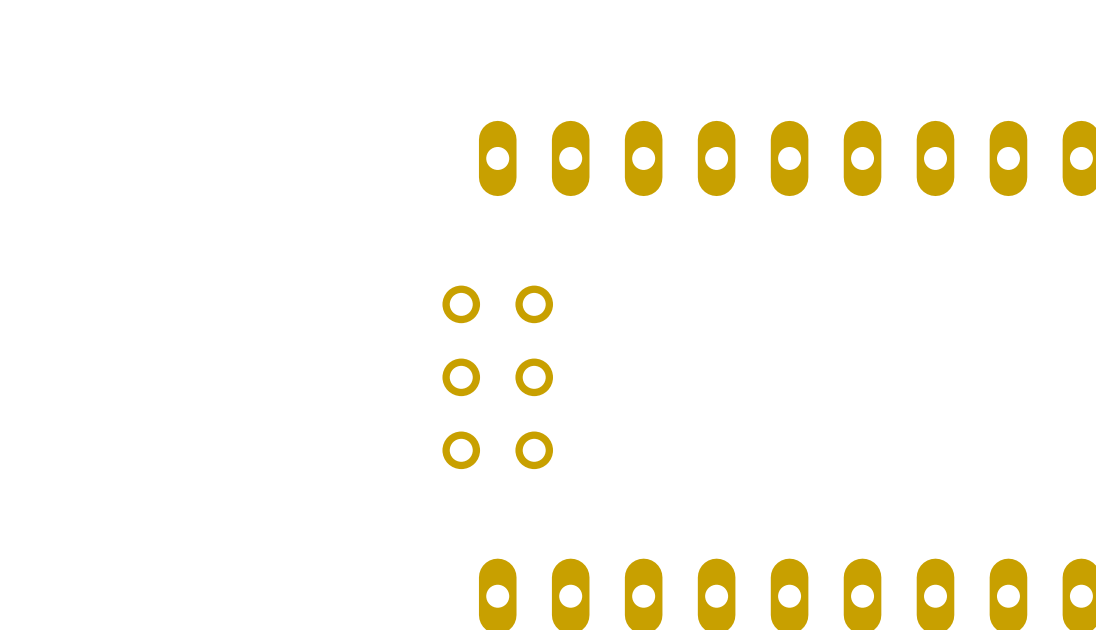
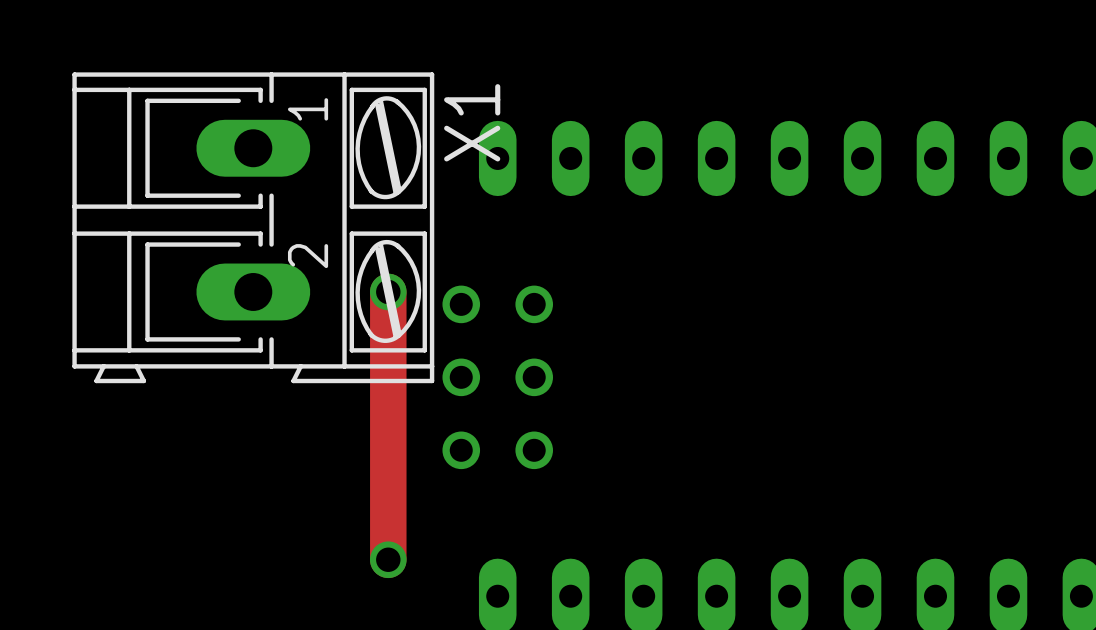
X1: none -> (253, 227)
track: none -> (388, 291) (388, 559)
via: none -> (388, 291)
via: none -> (388, 559)

